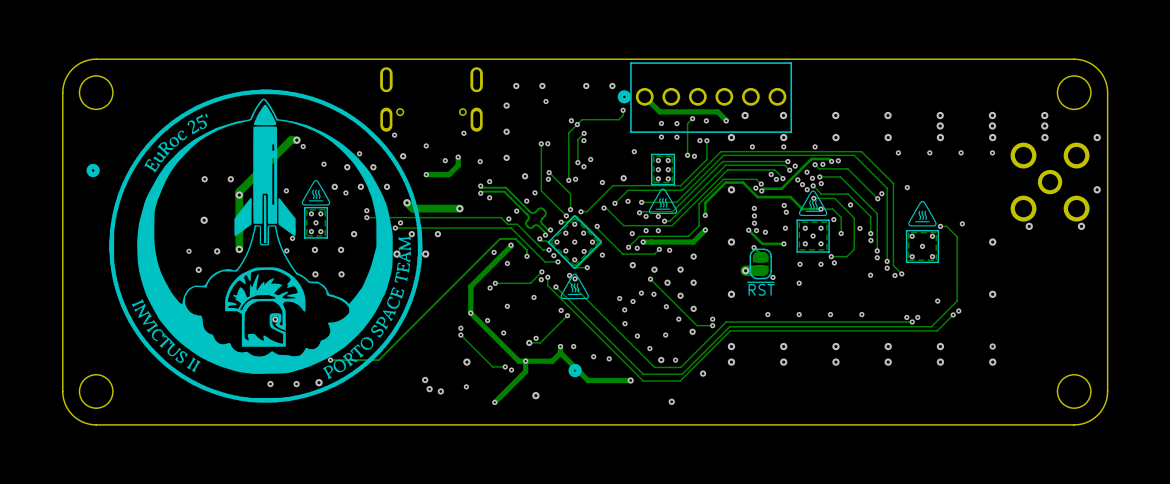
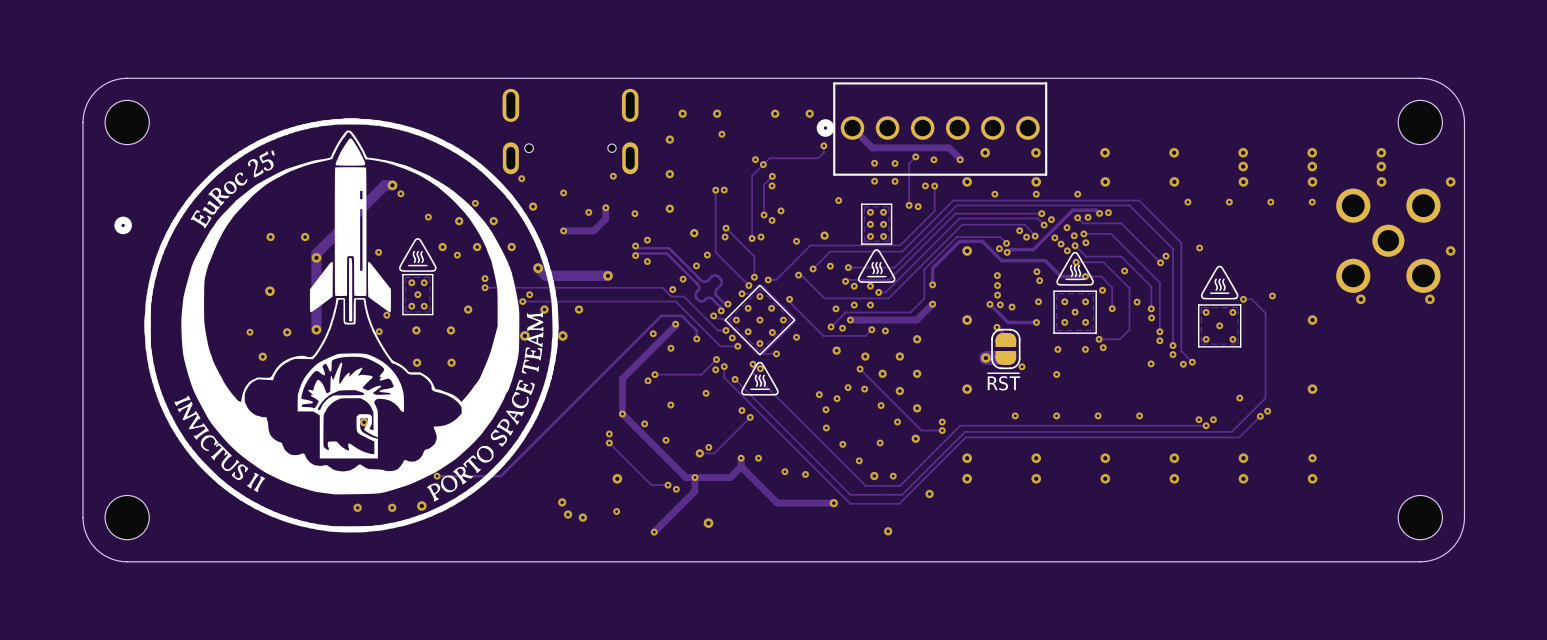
part: (575, 370) -> none

